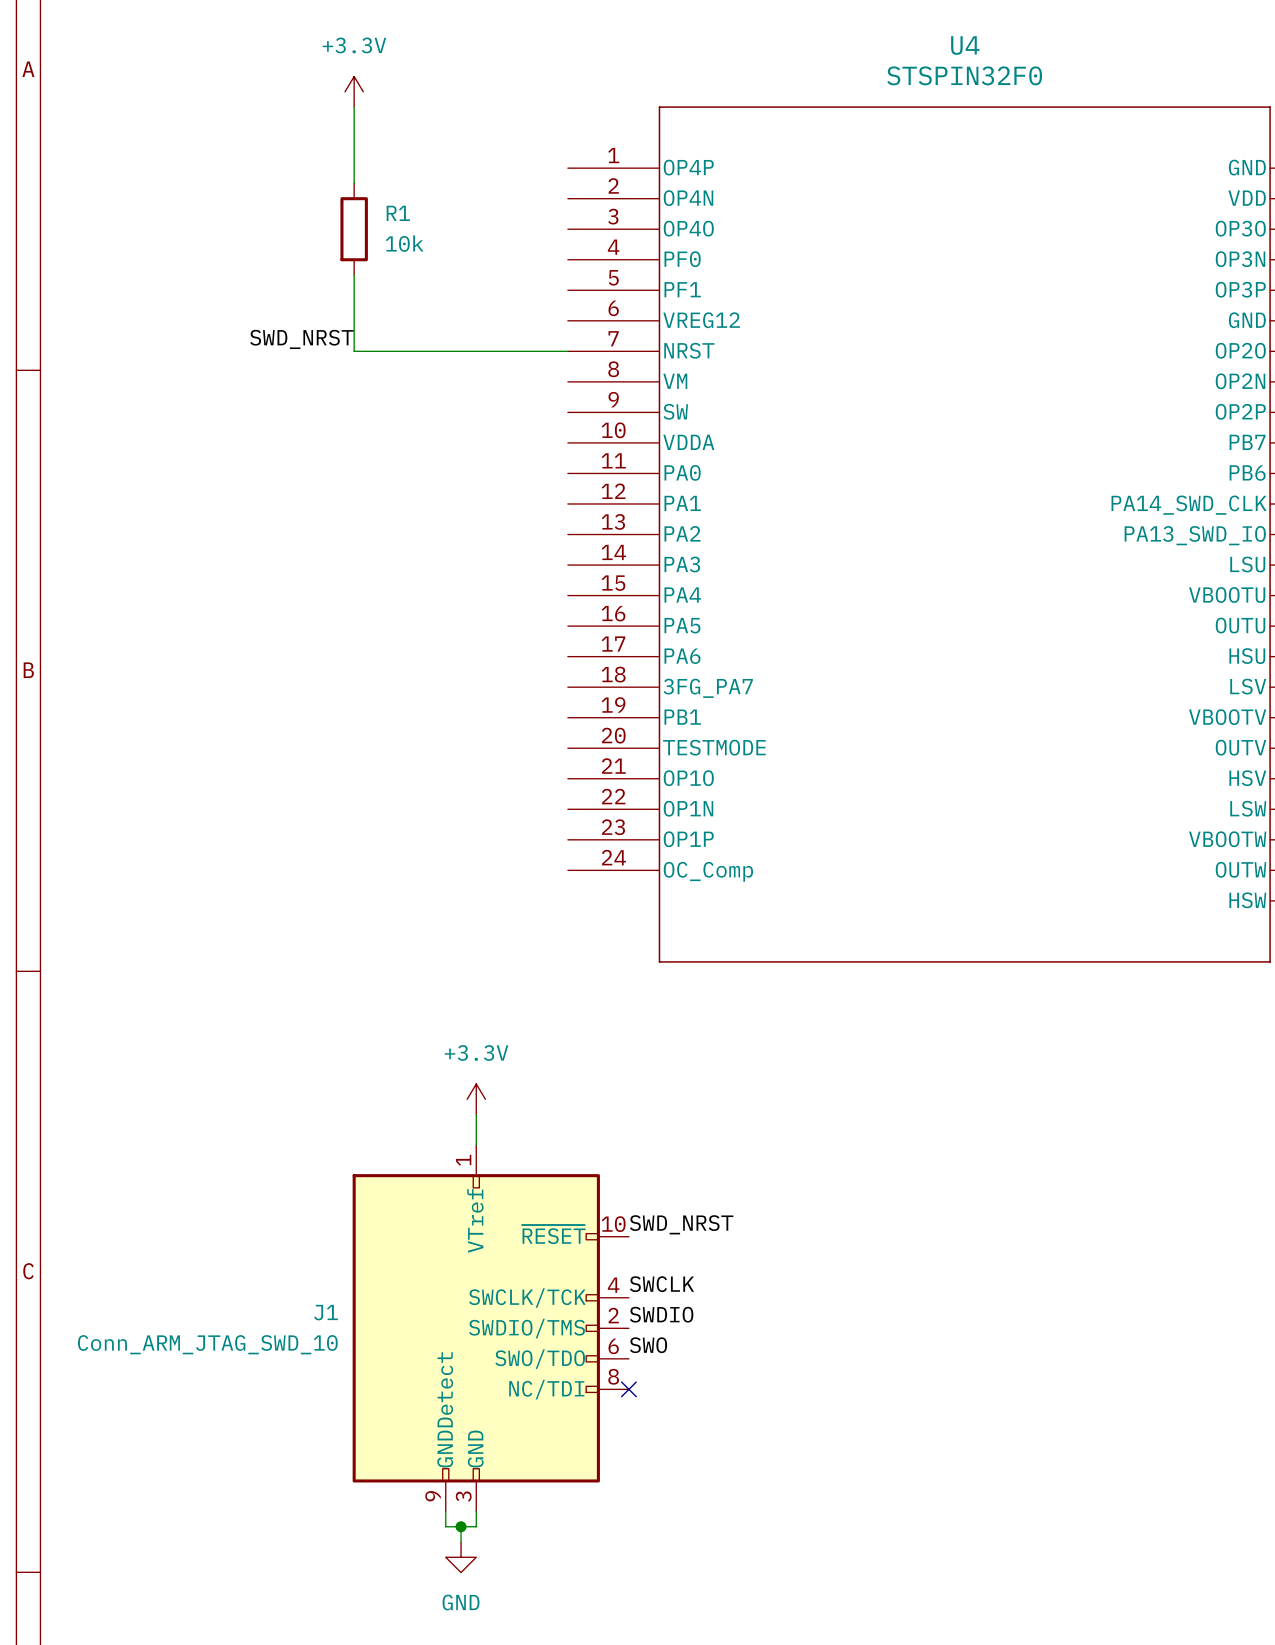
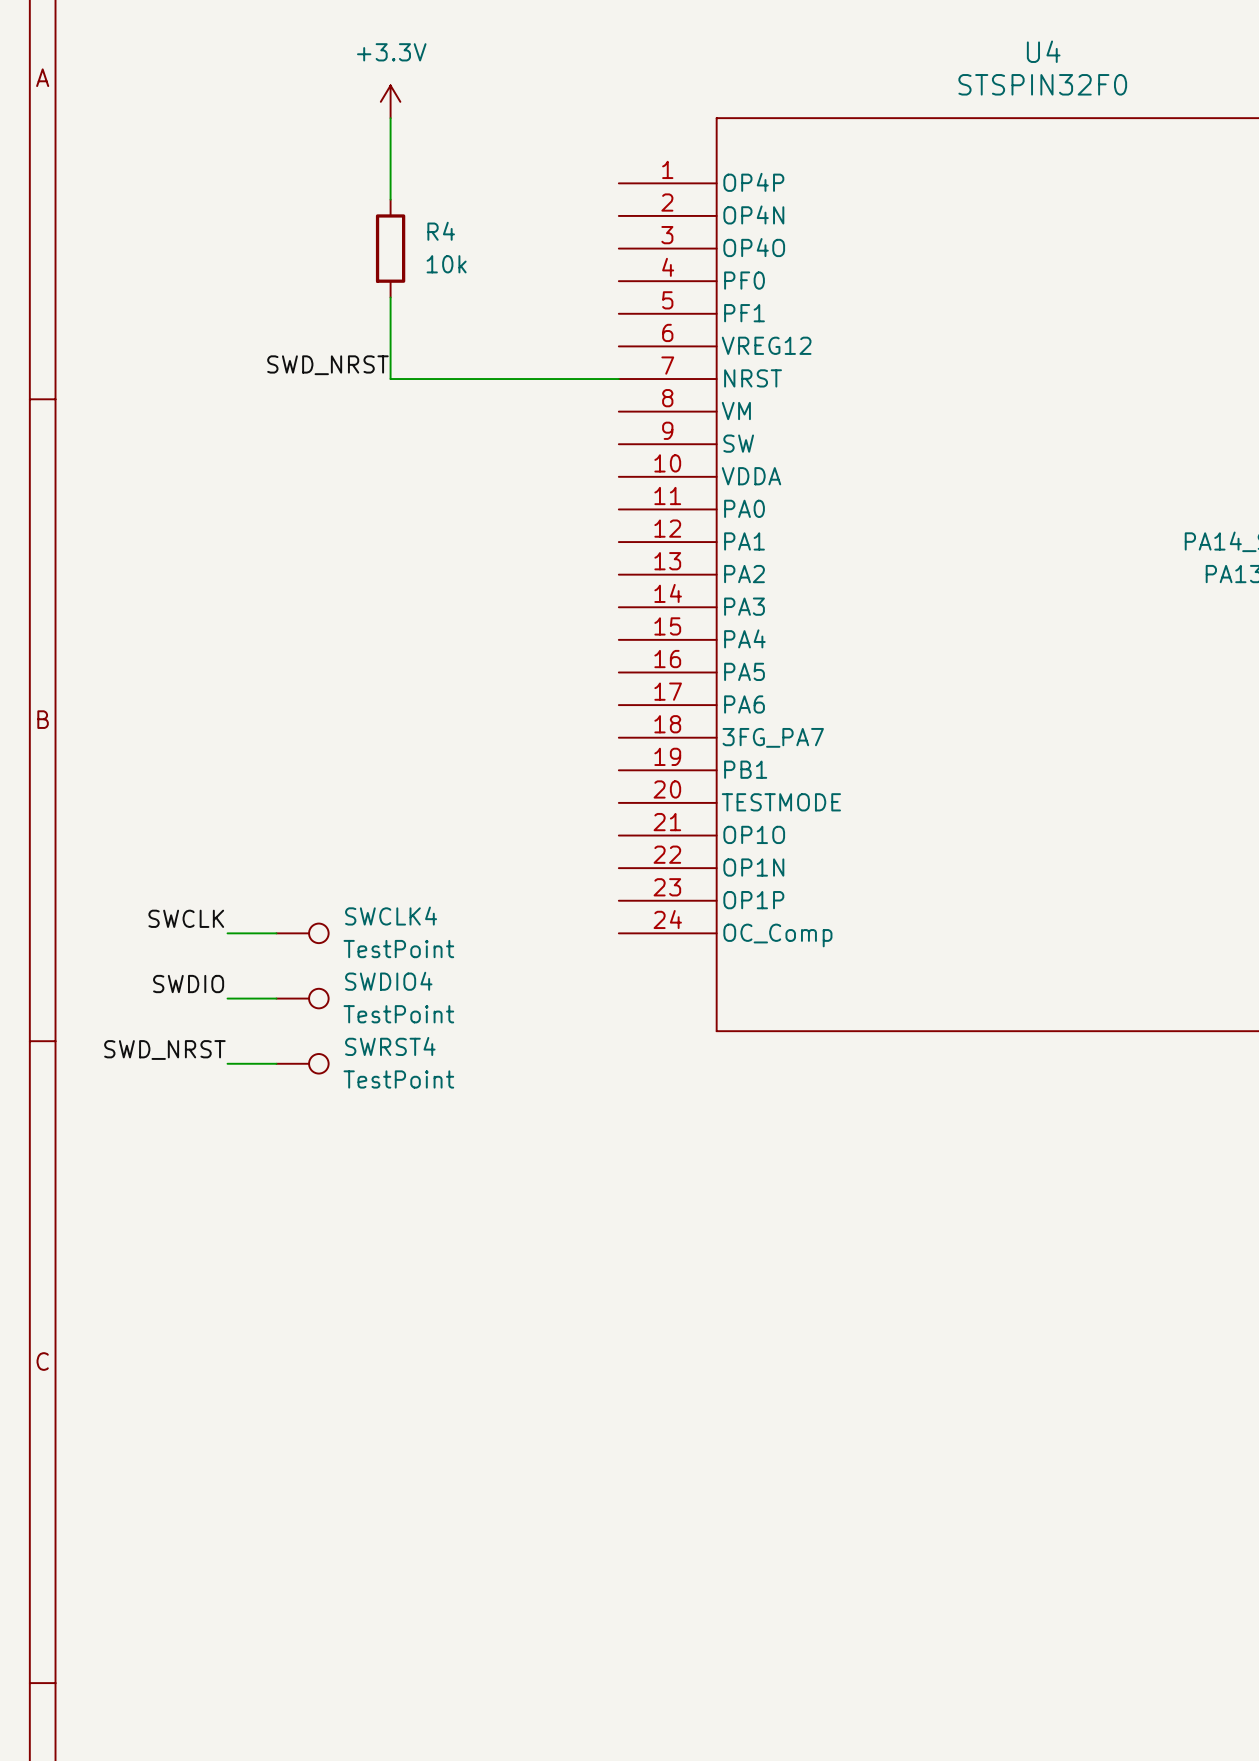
R1 name: R1 (398, 213) -> R4 (441, 231)
label: none -> SWCLK (186, 918)
wire: none -> (227, 933) (276, 933)
SWCLK4: none -> TestPoint (302, 933)
label: none -> SWDIO (188, 984)
wire: none -> (227, 998) (276, 998)
SWDIO4: none -> TestPoint (302, 998)
label: none -> SWD_NRST (164, 1050)
wire: none -> (227, 1063) (276, 1063)
SWRST4: none -> TestPoint (302, 1063)
power symbol: +3.3V (476, 1099) -> none
wire: (476, 1114) (476, 1145) -> none
label: SWD_NRST (681, 1224) -> none
label: SWCLK (661, 1284) -> none
label: SWDIO (661, 1314) -> none
J1: Conn_ARM_JTAG_SWD_10 (490, 1328) -> none
label: SWO (648, 1345) -> none
no-connect mark: (628, 1389) -> none
wire: (445, 1511) (445, 1526) (476, 1526) (476, 1511) -> none
wire: (461, 1526) (461, 1542) -> none
junction: (461, 1526) -> none
power symbol: GND (461, 1557) -> none

